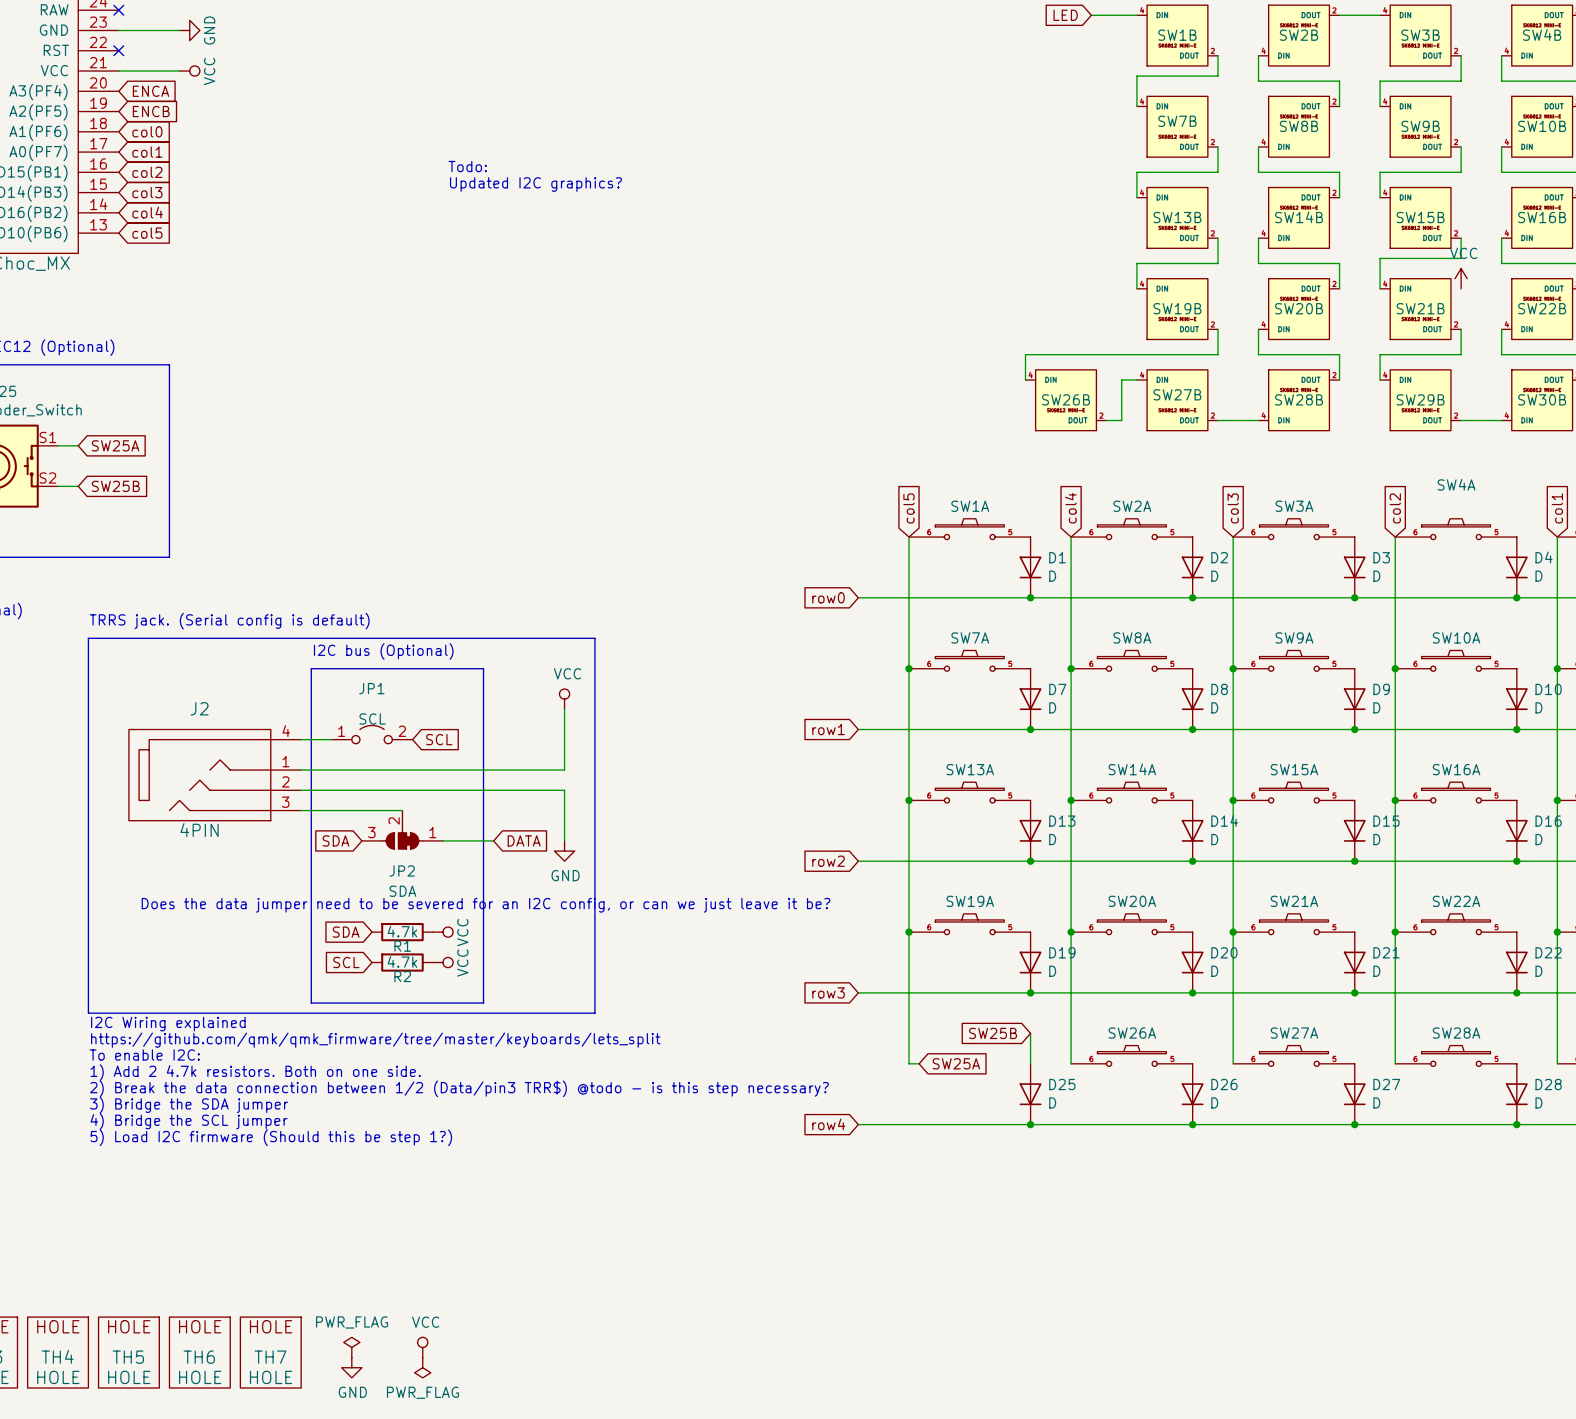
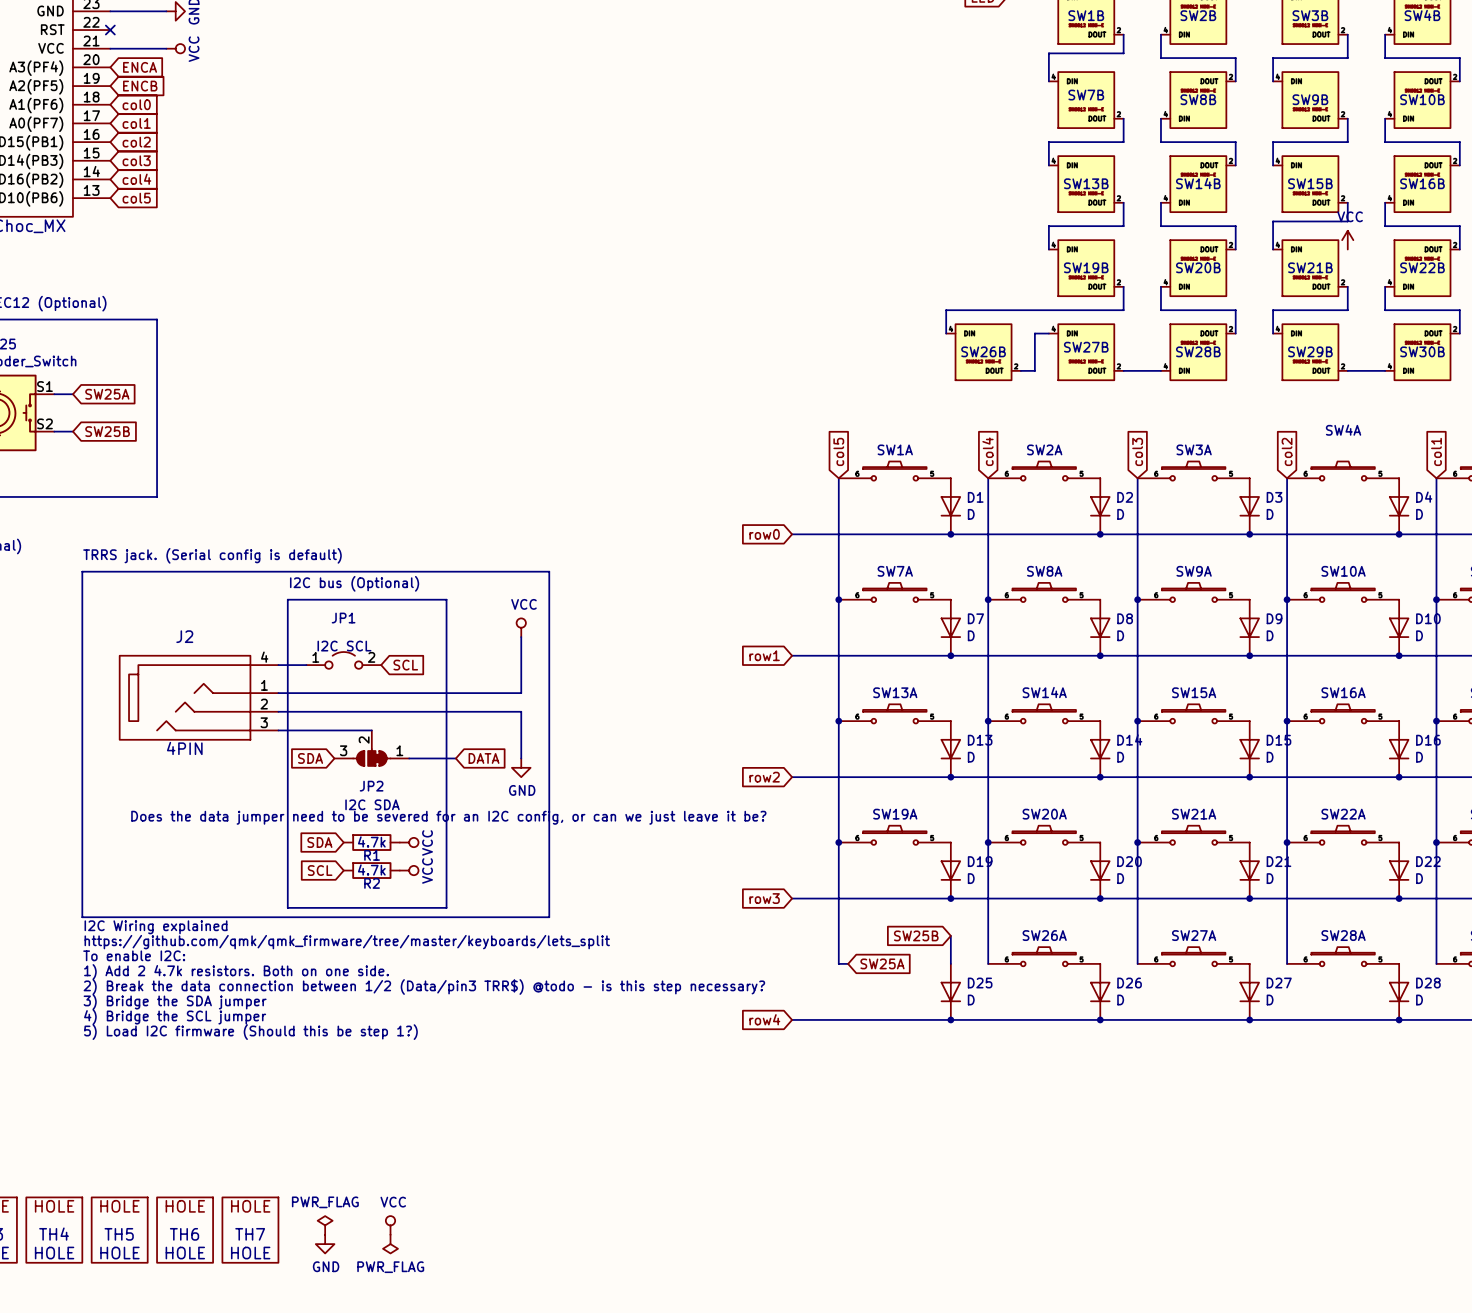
text: Todo: (467, 166) -> none
text: Updated I2C graphics? (535, 184) -> none
JP1 value: SCL (372, 719) -> I2C SCL (344, 646)
JP2 value: SDA (402, 891) -> I2C SDA (372, 804)

